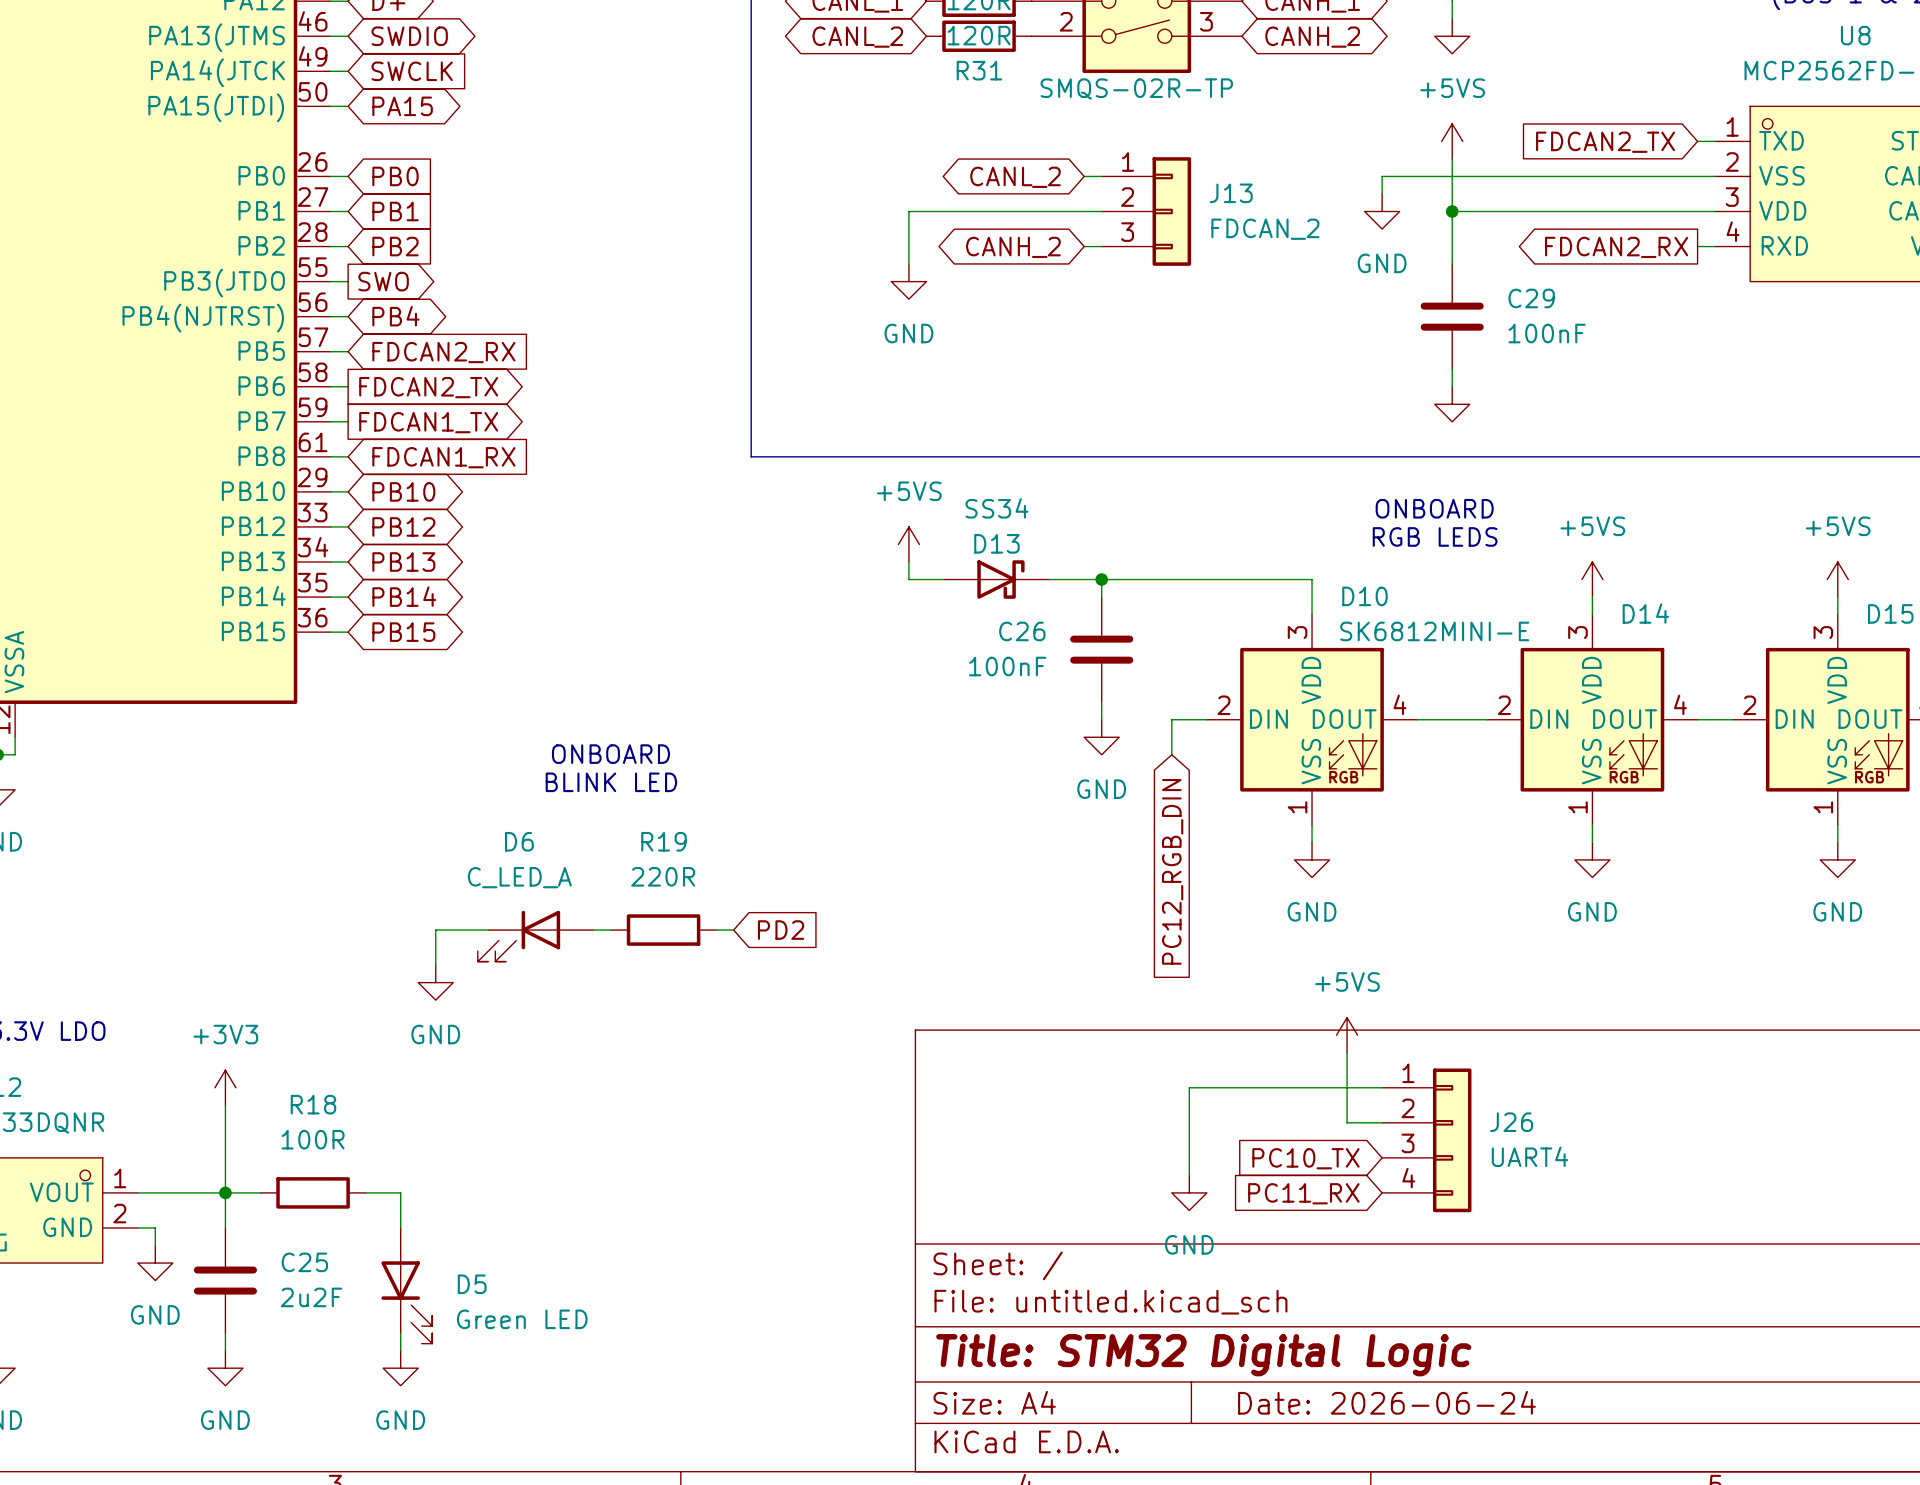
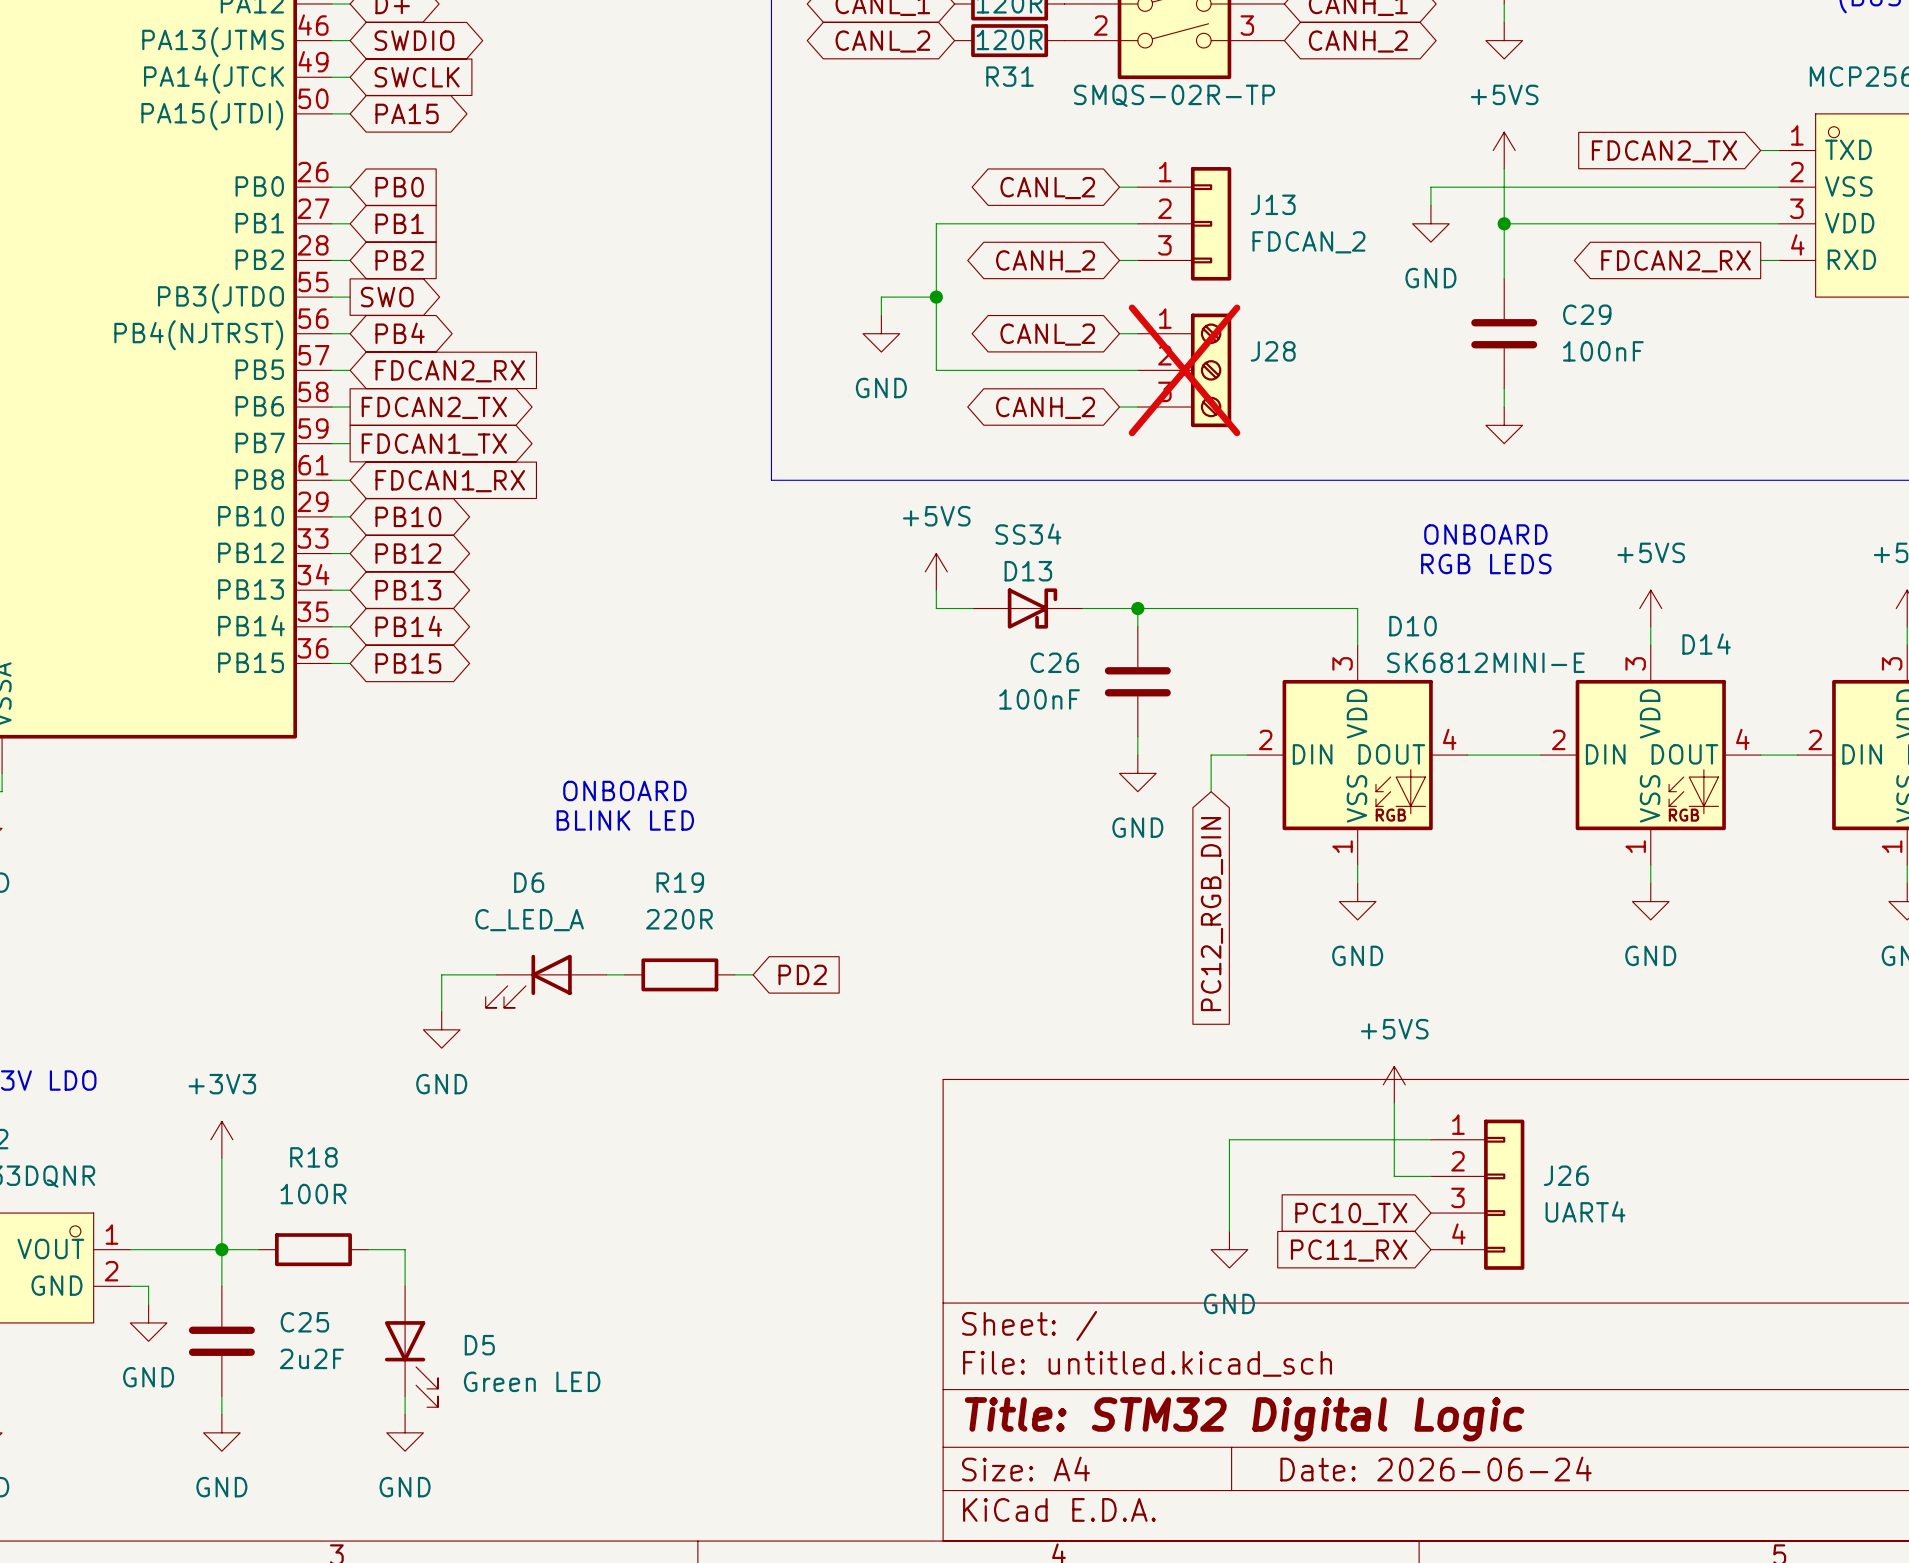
wire: none -> (936, 278) (936, 370) (1137, 370)
wire: none -> (936, 297) (881, 297) (881, 315)
power symbol position: GND (908, 281) -> GND (881, 333)
junction: none -> (936, 297)
wire: none -> (1119, 333) (1137, 333)
global label: none -> CANL_2 (1047, 334)
J28: none -> (1184, 370)
wire: none -> (1119, 407) (1137, 407)
global label: none -> CANH_2 (1045, 407)

